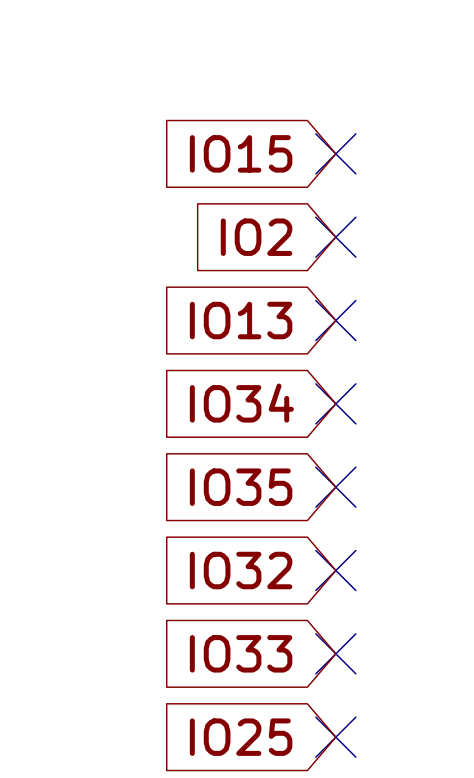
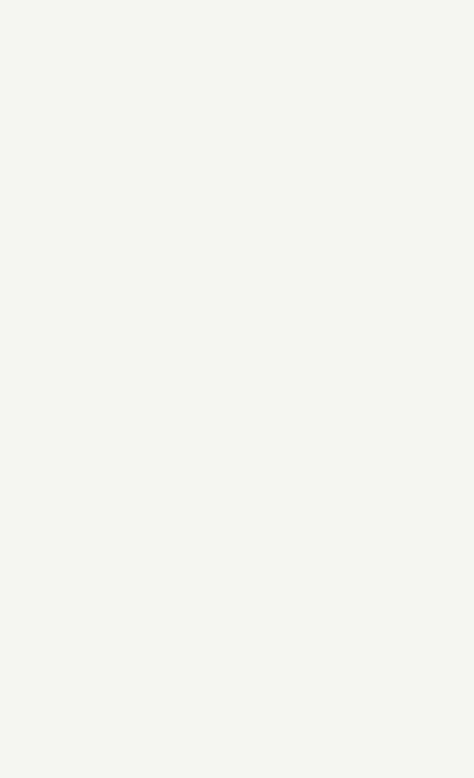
global label: IO15 (241, 153) -> none
no-connect mark: (335, 153) -> none
global label: IO2 (256, 237) -> none
no-connect mark: (335, 237) -> none
global label: IO13 (241, 320) -> none
no-connect mark: (335, 320) -> none
global label: IO34 (241, 403) -> none
no-connect mark: (335, 403) -> none
global label: IO35 (241, 487) -> none
no-connect mark: (335, 487) -> none
global label: IO32 (241, 570) -> none
no-connect mark: (335, 570) -> none
global label: IO33 (241, 653) -> none
no-connect mark: (335, 653) -> none
global label: IO25 (241, 737) -> none
no-connect mark: (335, 737) -> none

